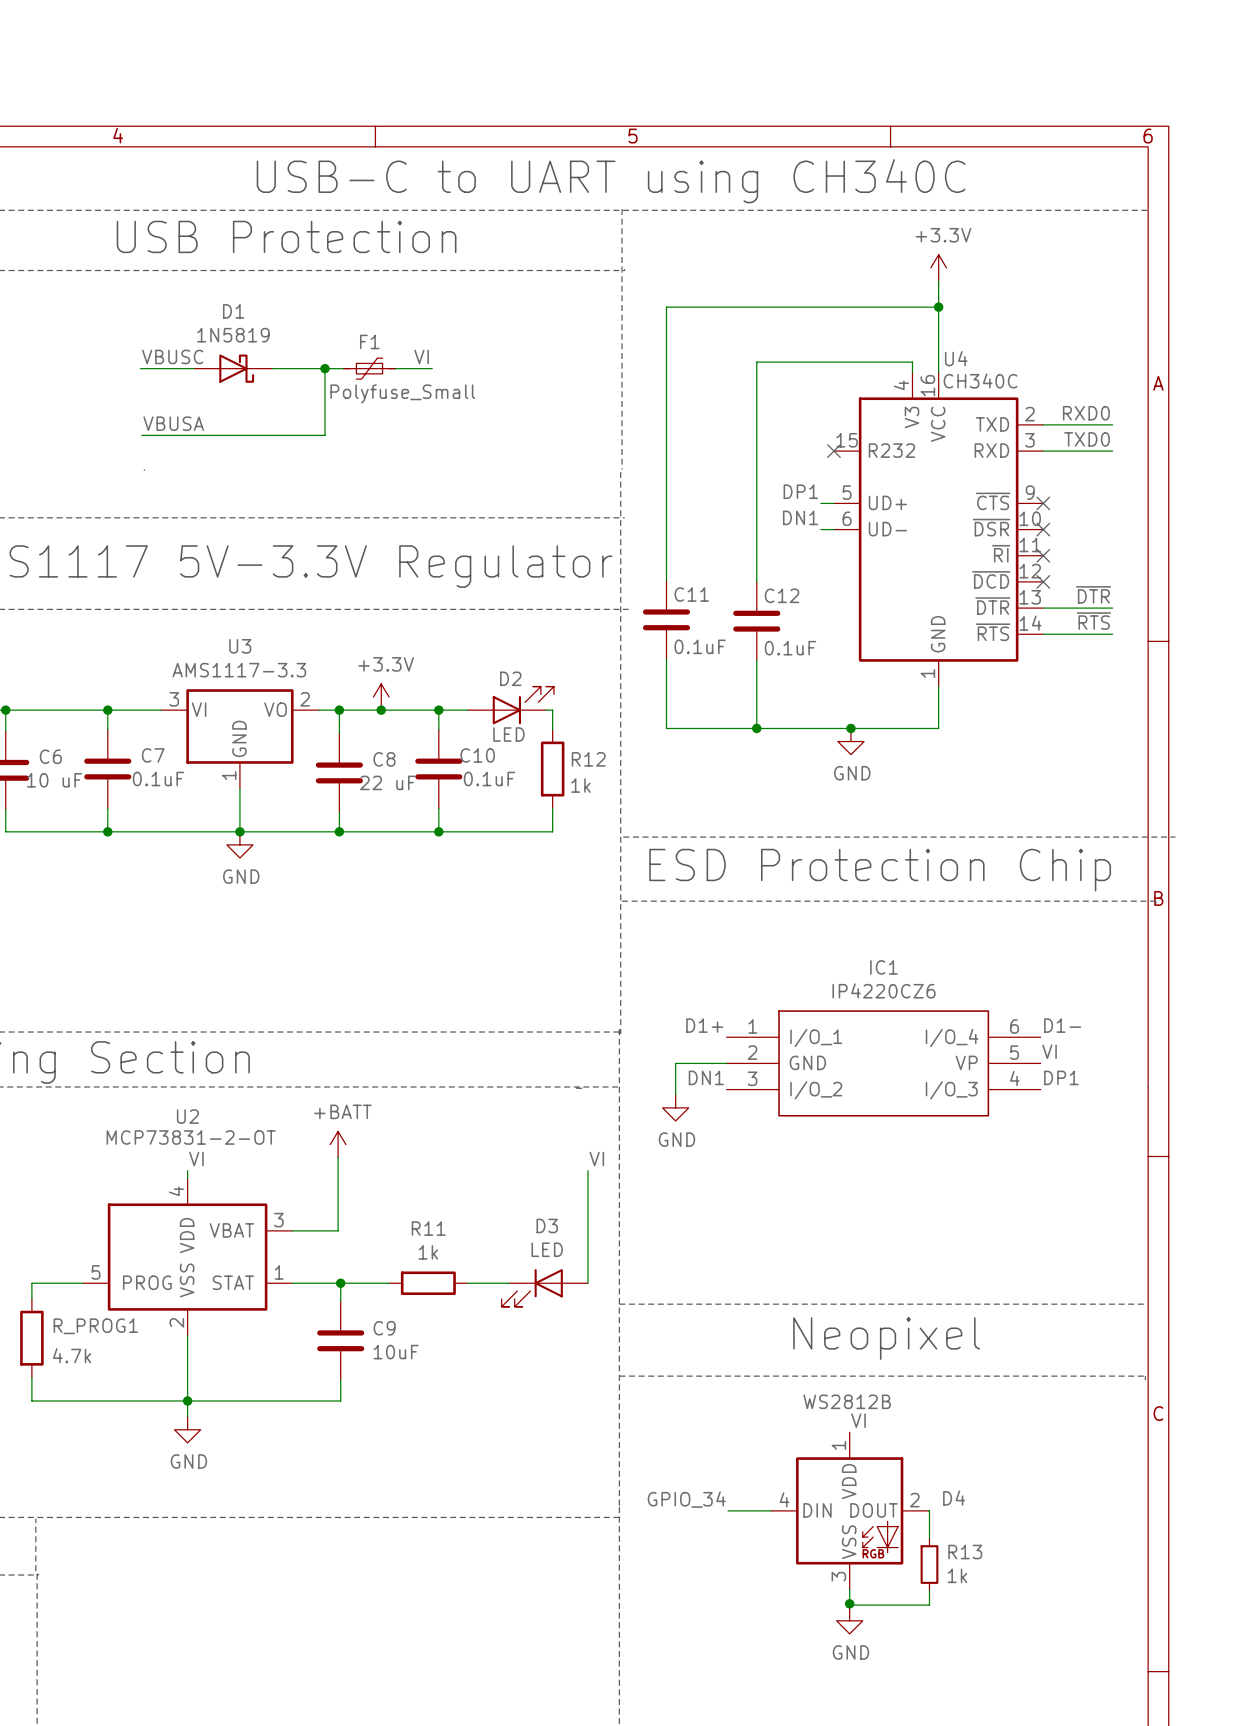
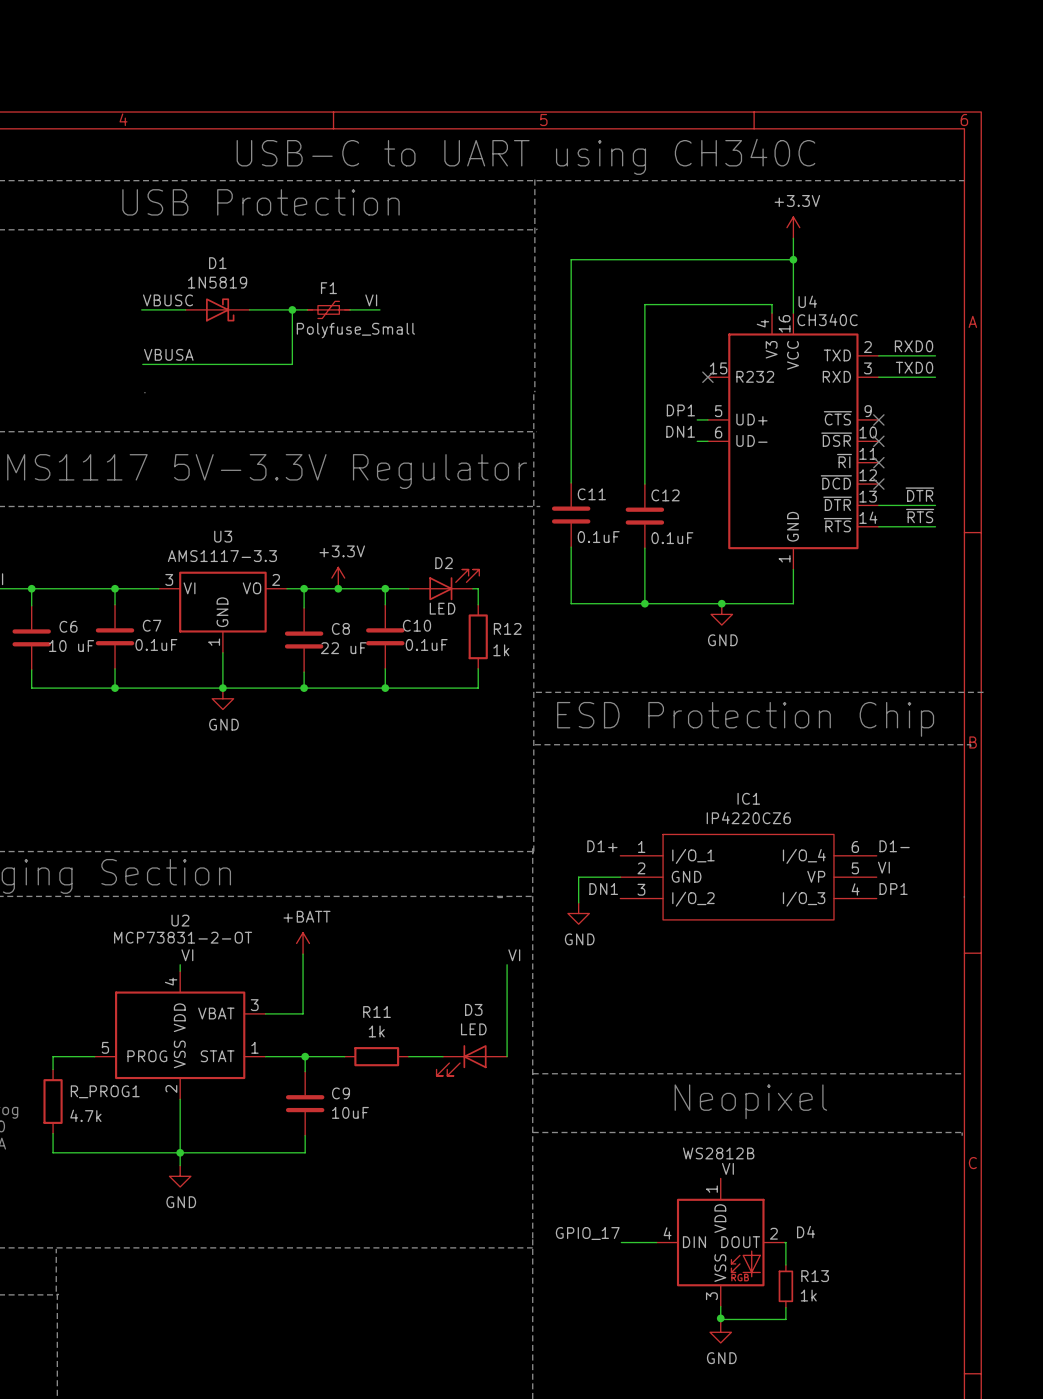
label: GPIO_34 (686, 1499) -> GPIO_17 (587, 1233)

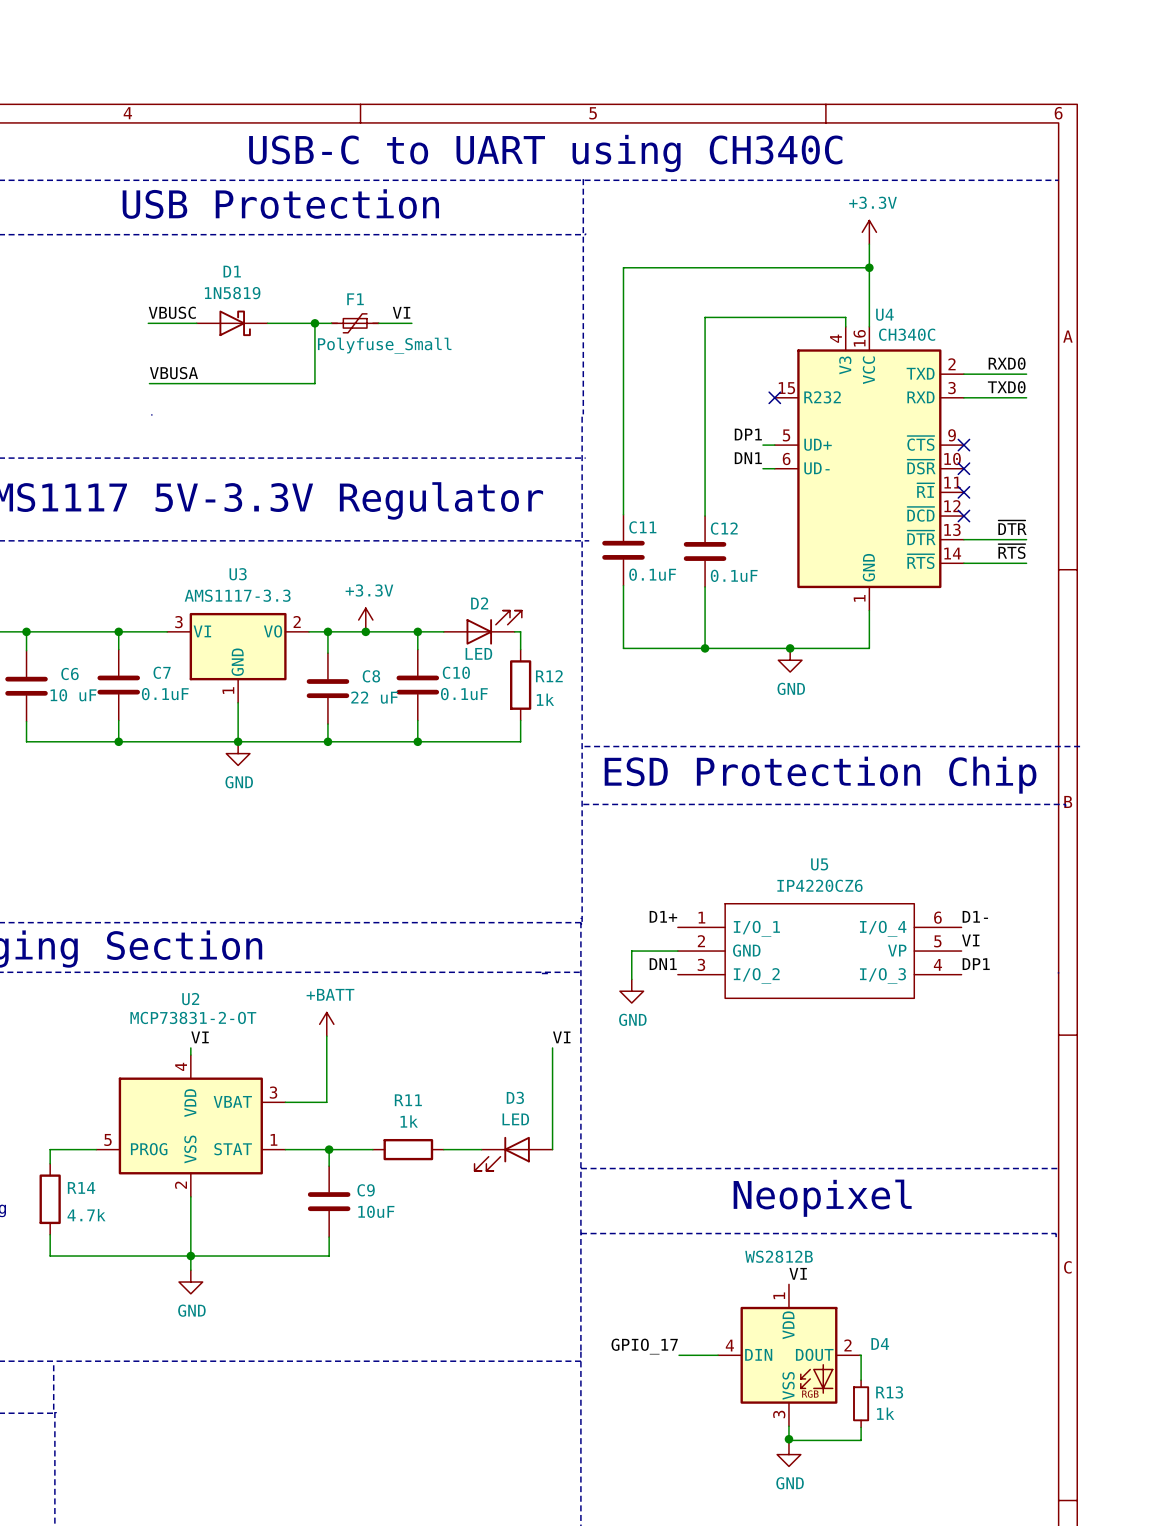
IC1 name: IC1 (748, 798) -> U5 (819, 864)
R_PROG1 name: R_PROG1 (105, 1091) -> R14 (81, 1187)

